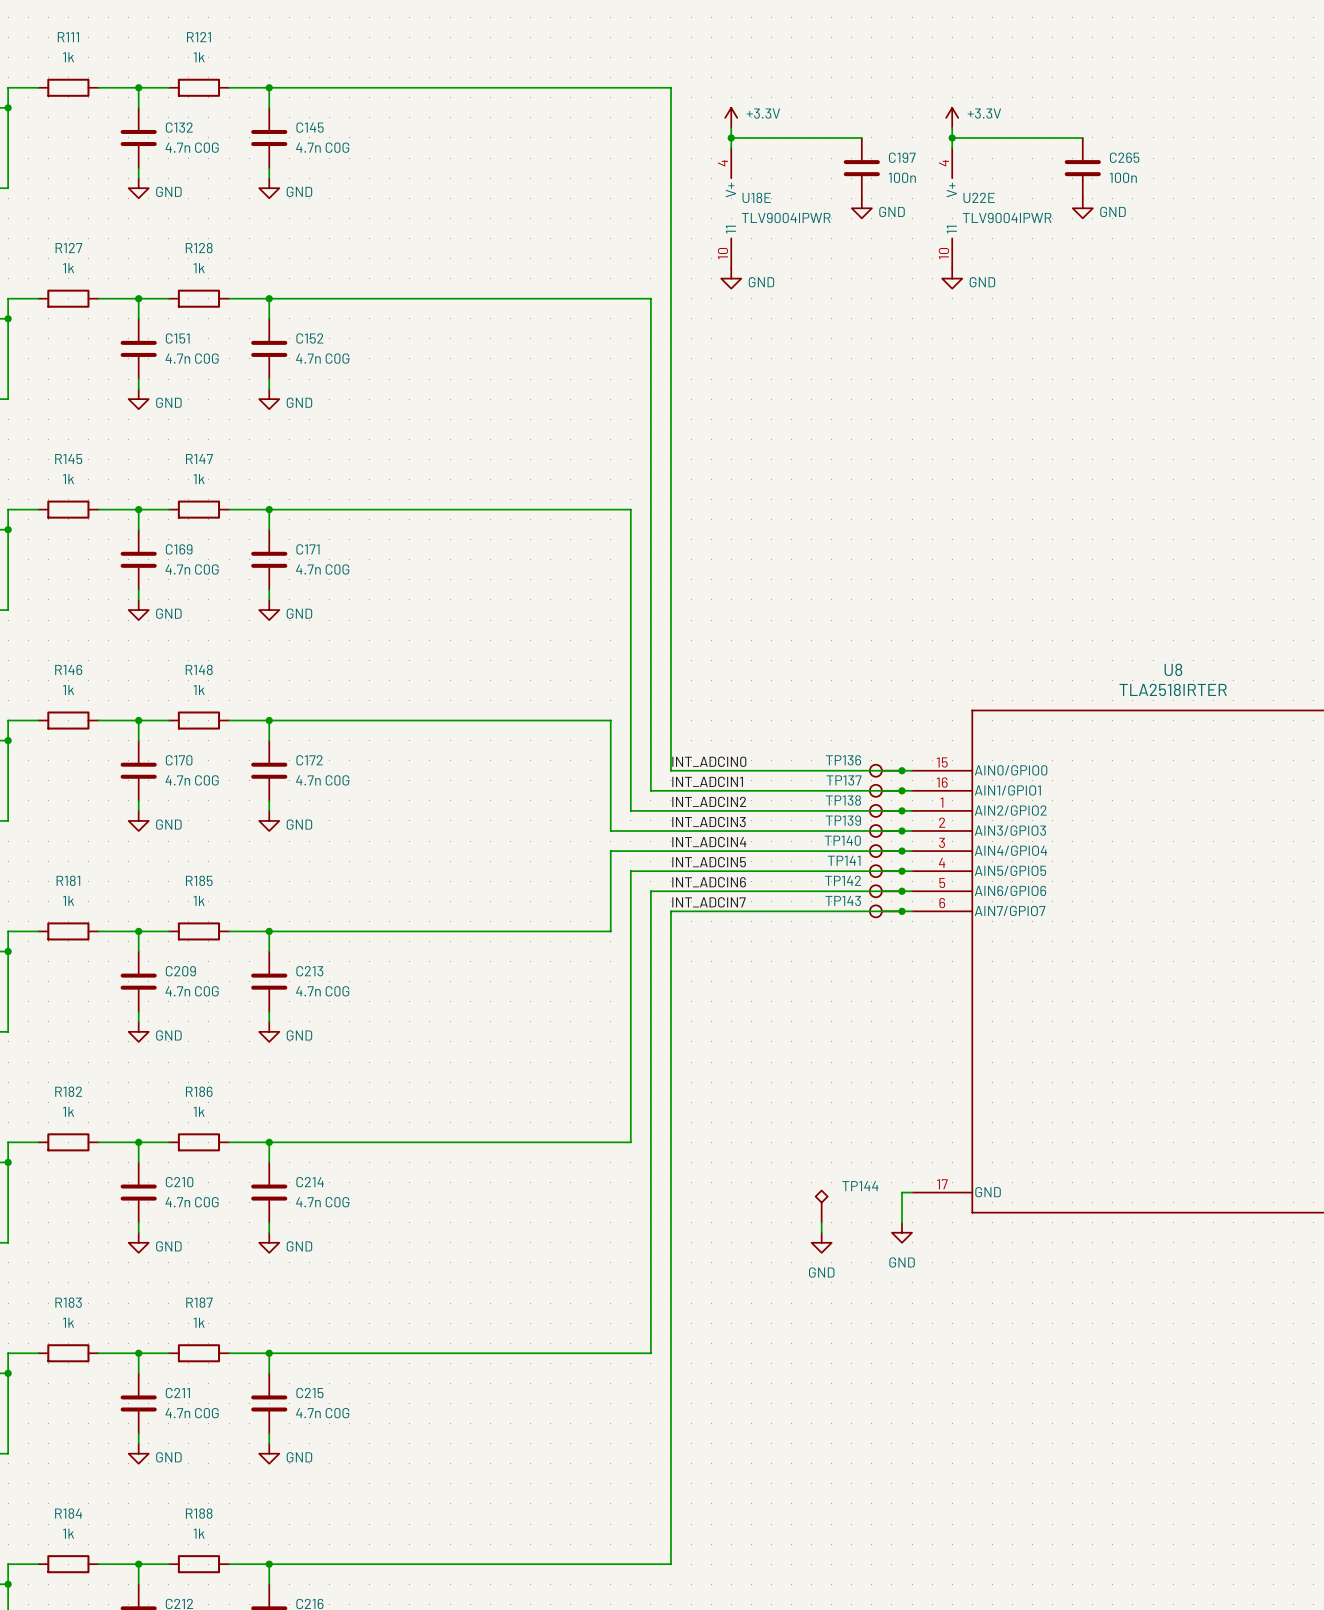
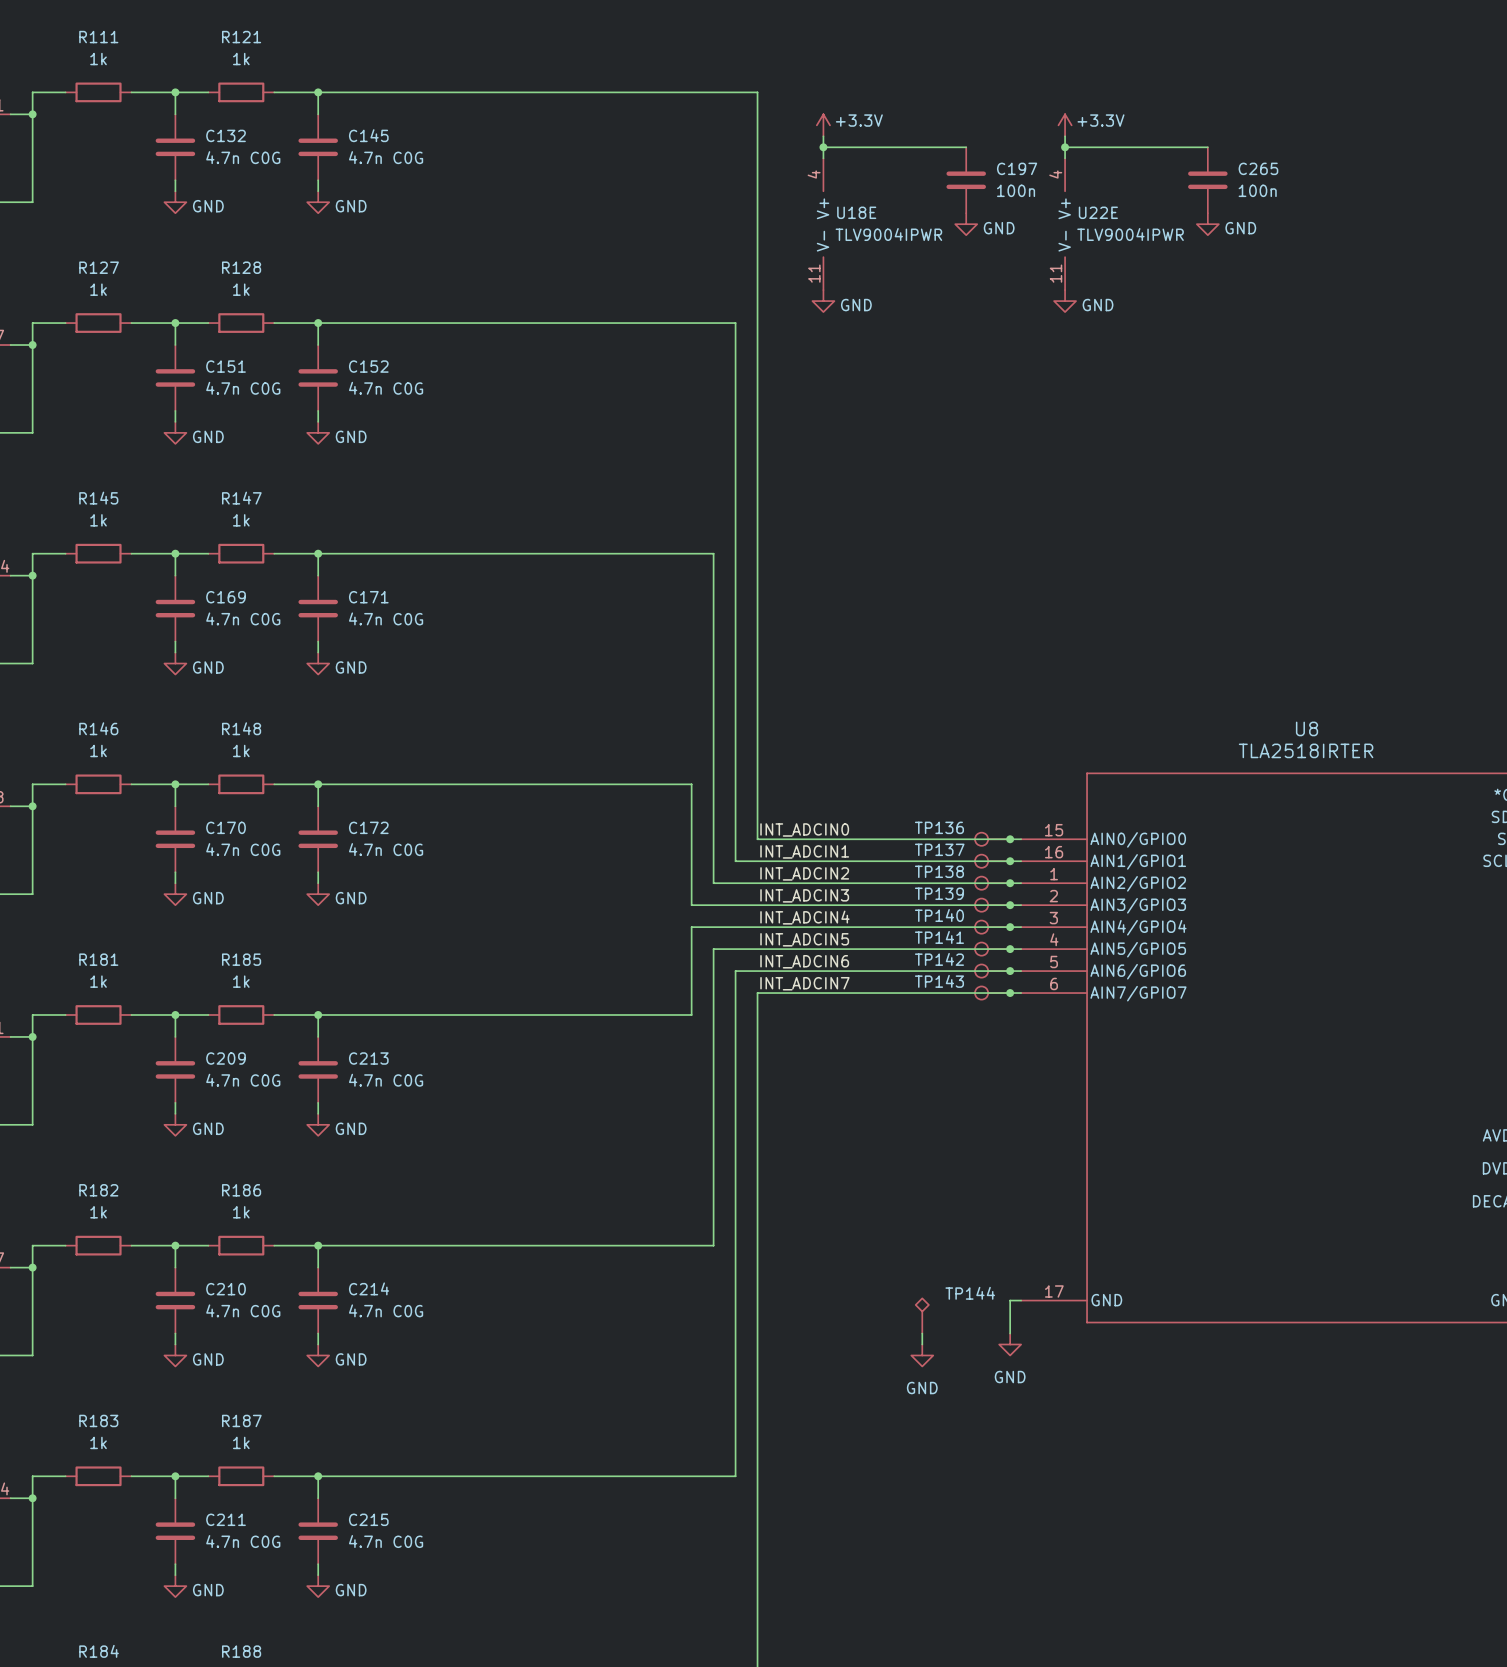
U18E pin name: 11 (730, 229) -> V- (823, 241)
U22E pin name: 11 (951, 229) -> V- (1064, 241)
U18E pin number: 10 (722, 253) -> 11 (814, 273)
U22E pin number: 10 (943, 253) -> 11 (1056, 273)

